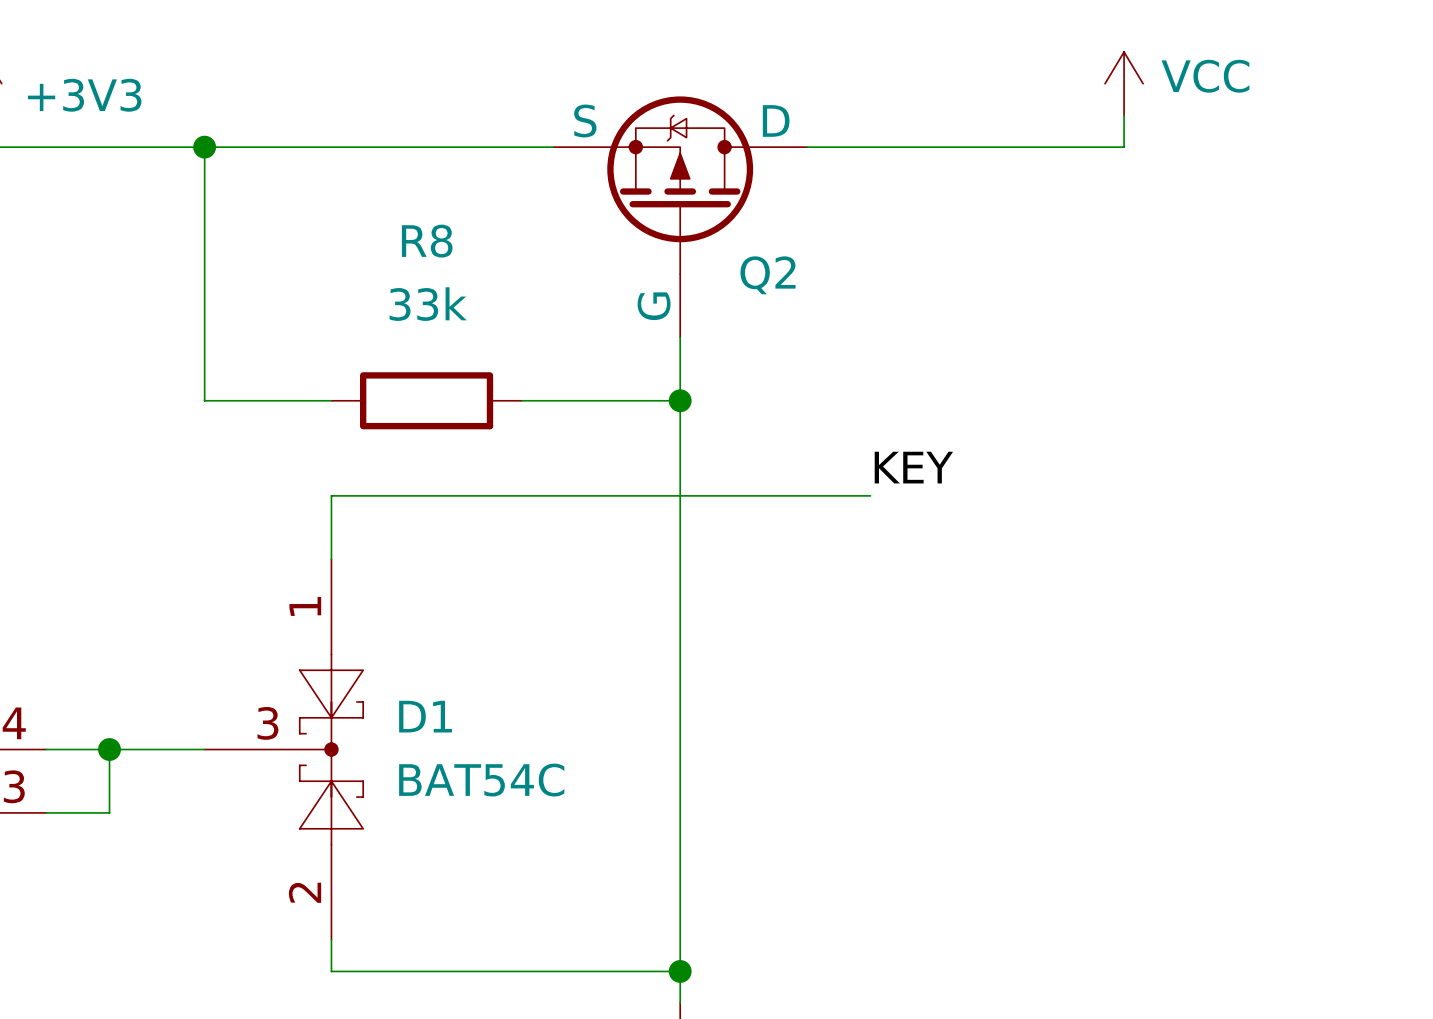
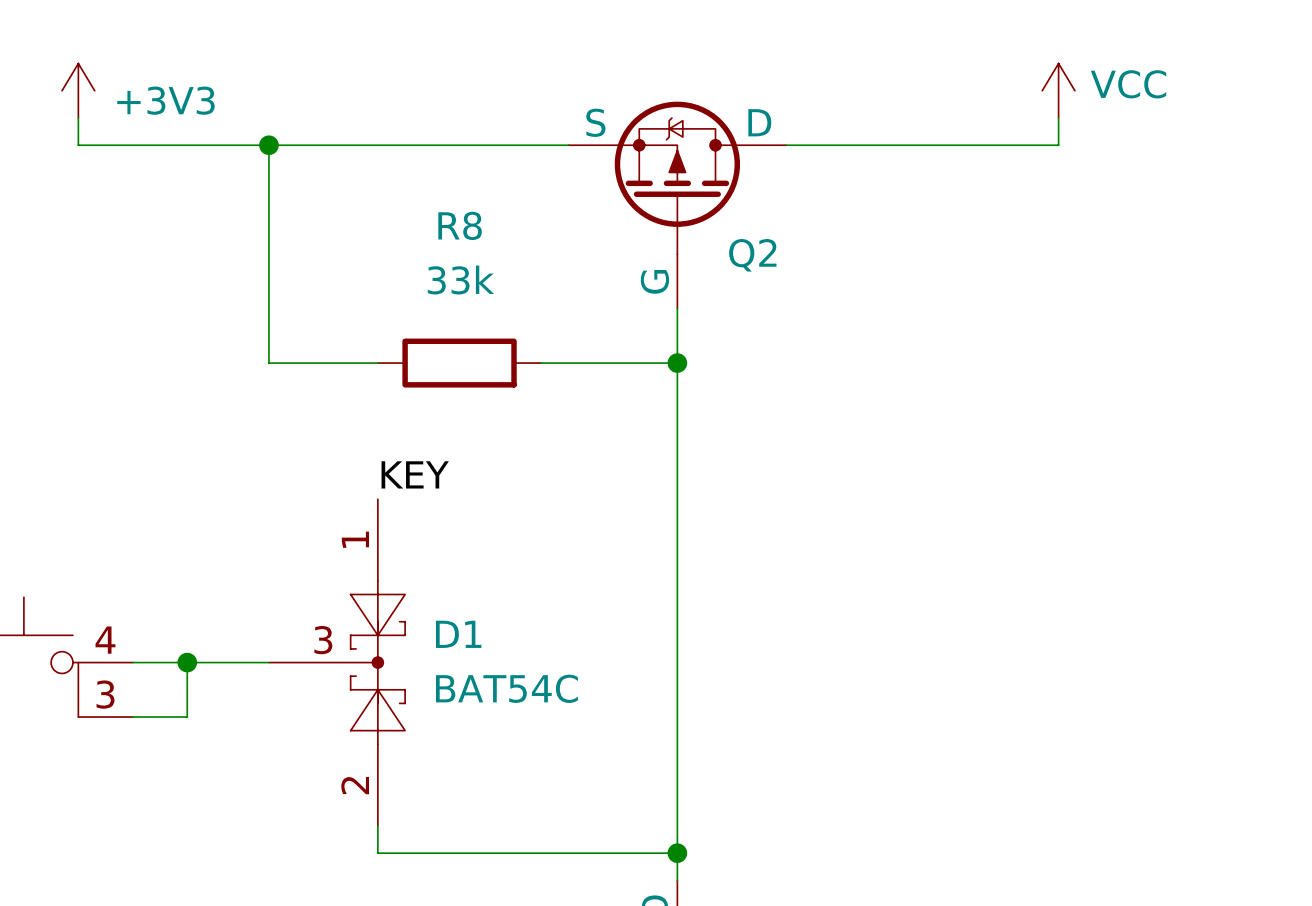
label position: KEY (913, 467) -> KEY (415, 474)
wire: (870, 495) (331, 495) (331, 559) -> none

